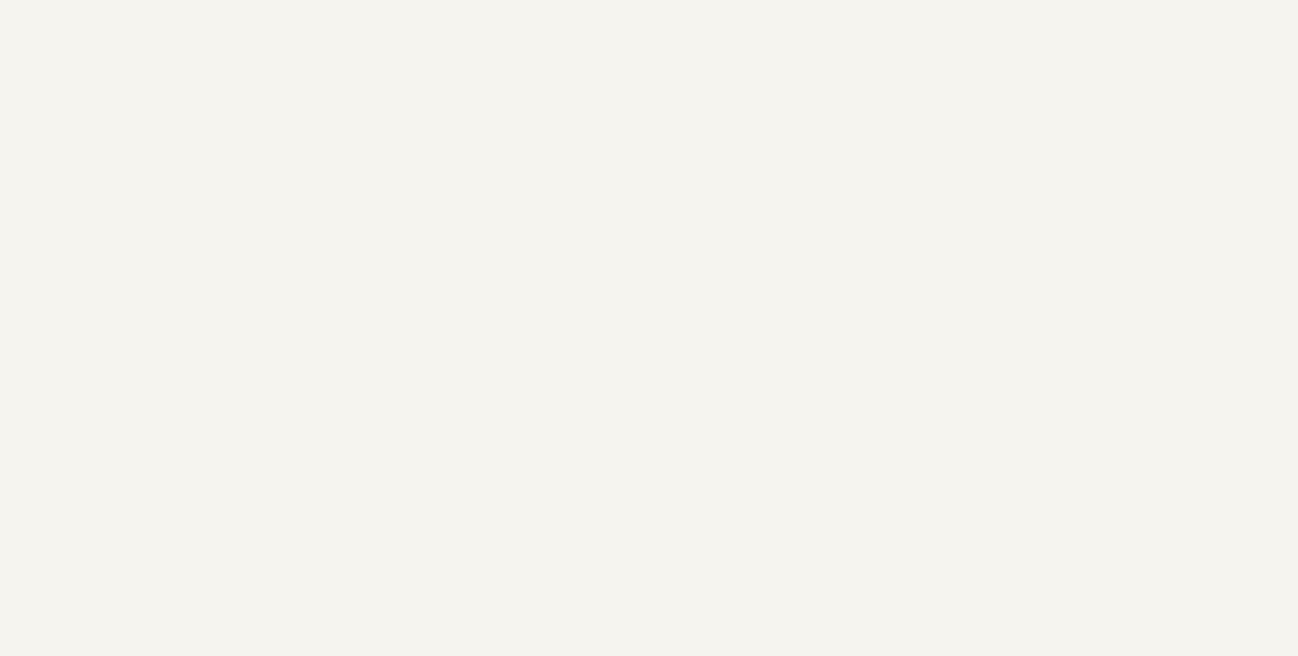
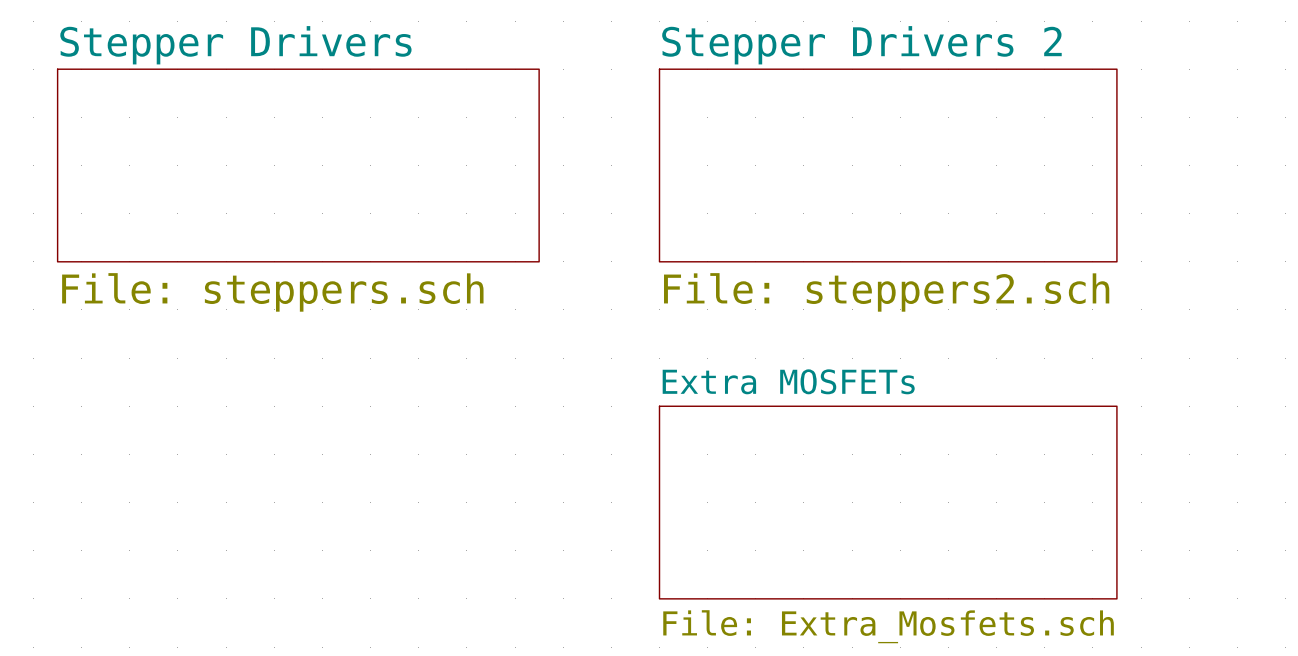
sheet Stepper Drivers: none -> File: steppers.sch (298, 165)
sheet Stepper Drivers 2: none -> File: steppers2.sch (888, 165)
sheet Extra MOSFETs: none -> File: Extra_Mosfets.sch (888, 502)

